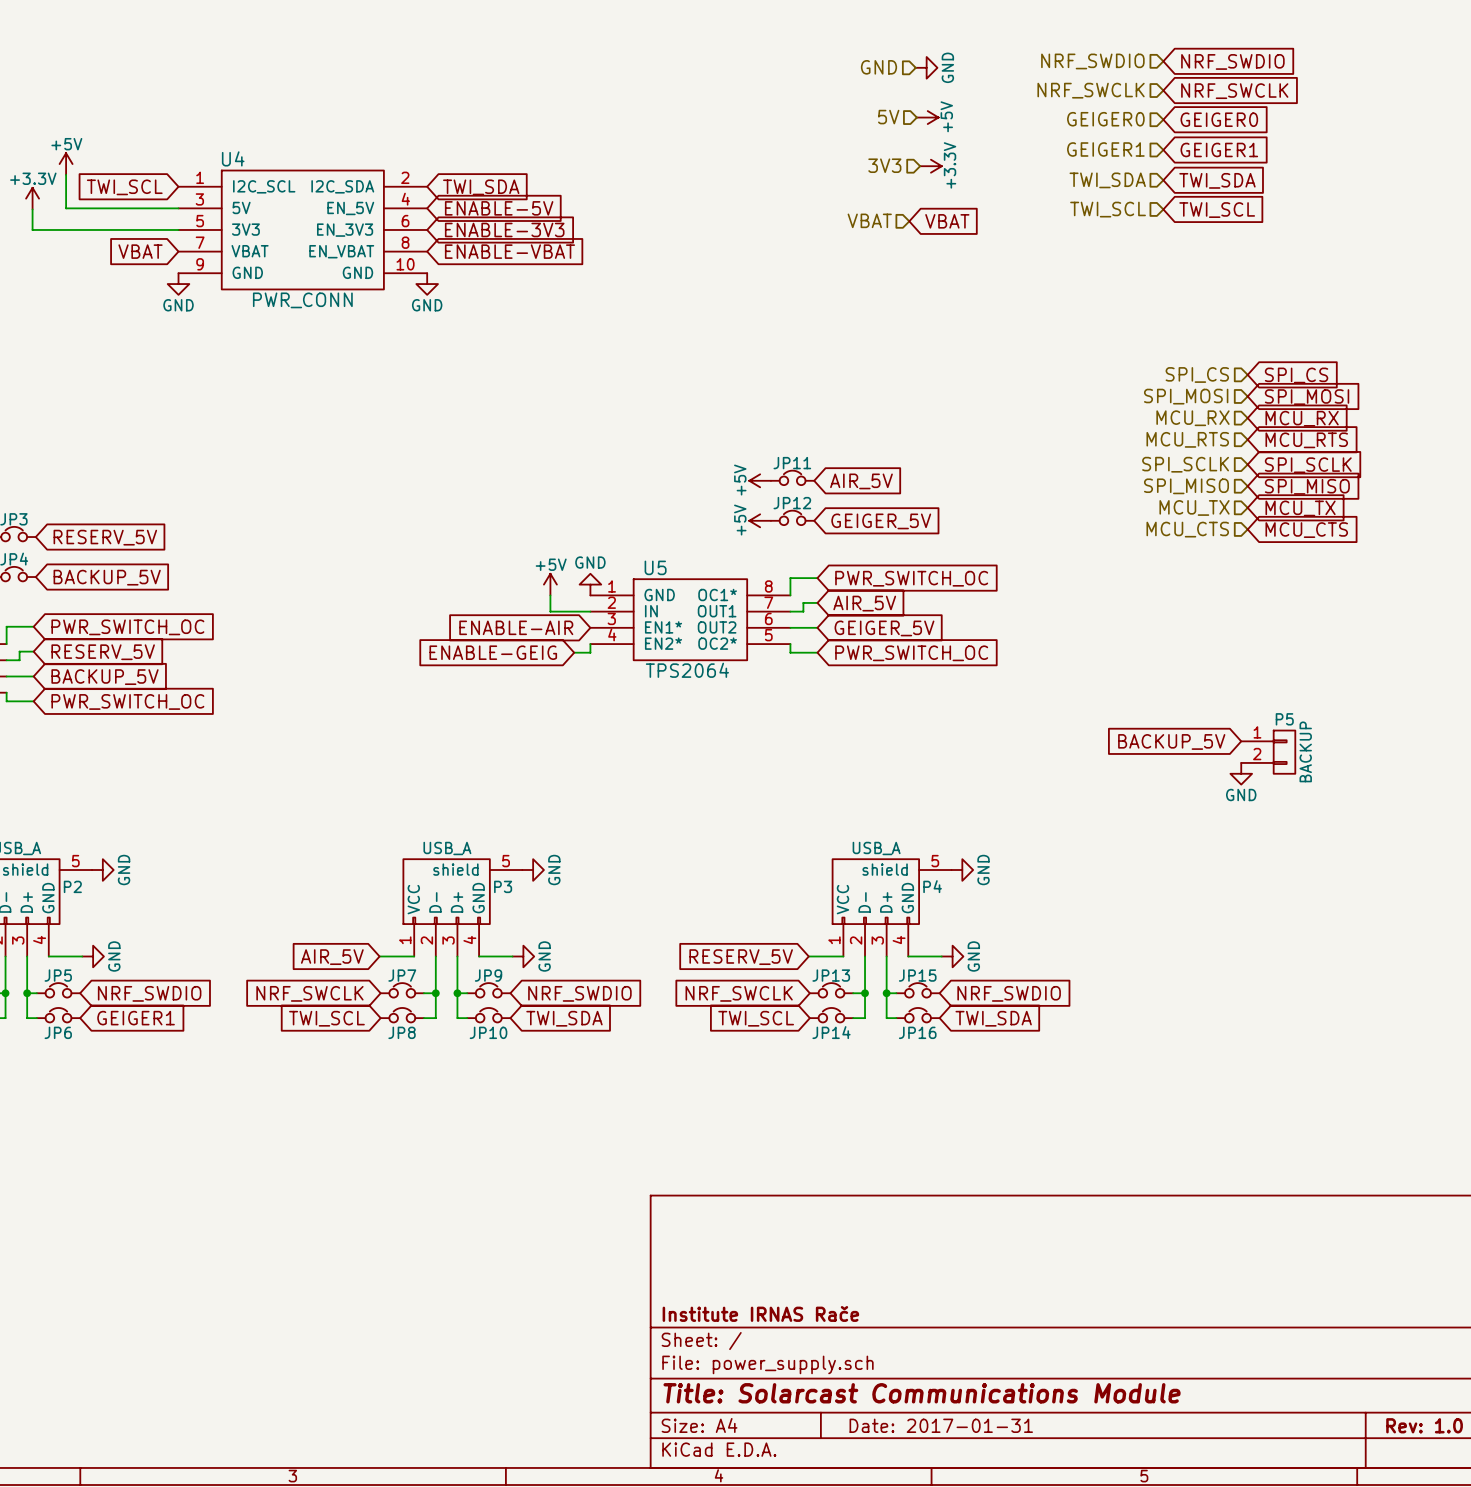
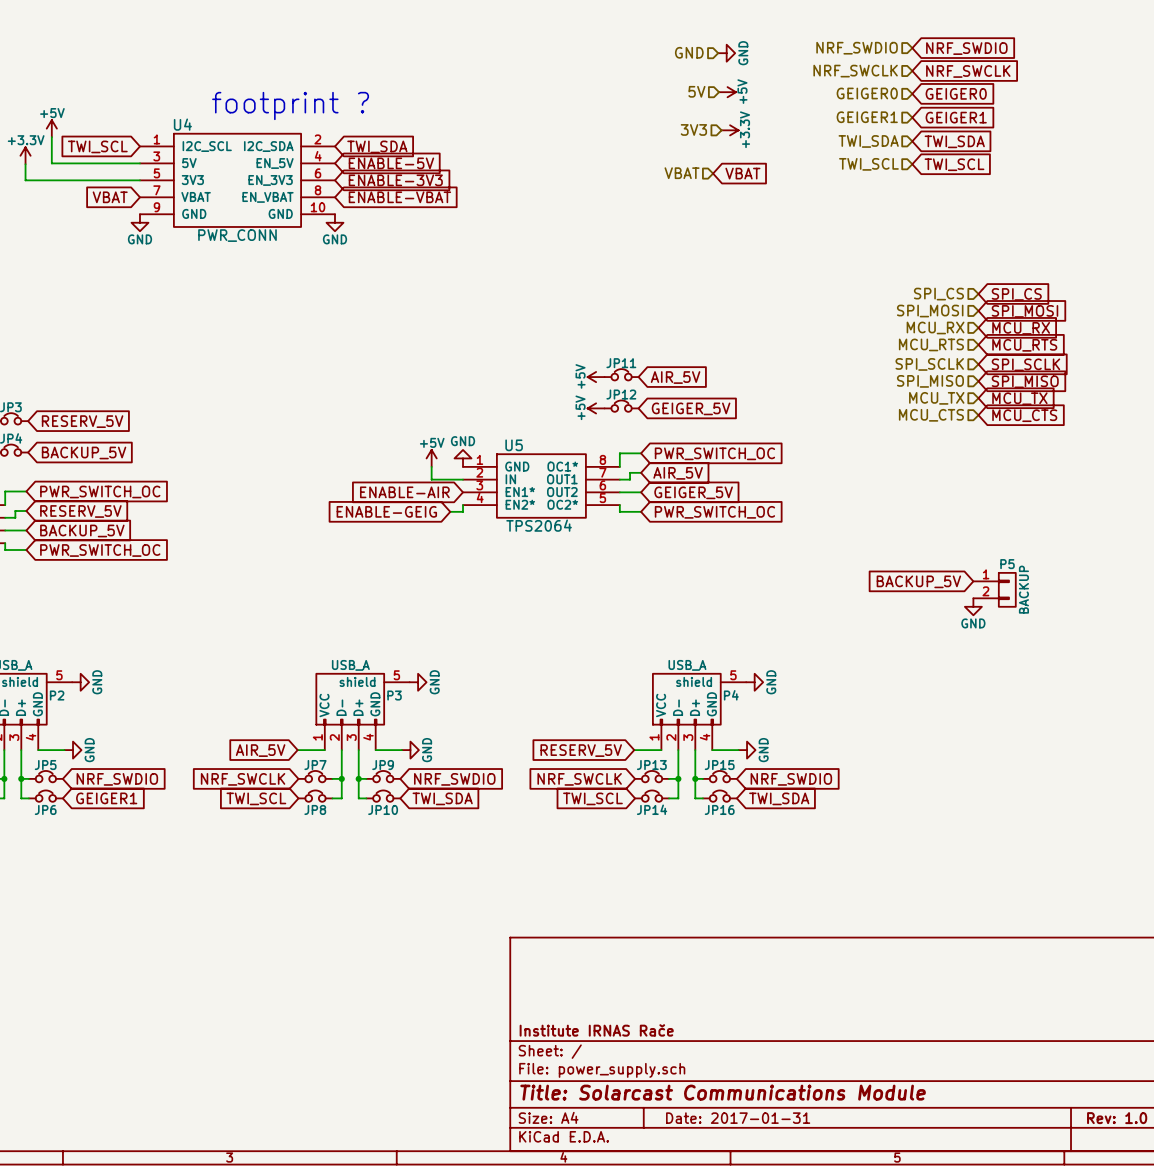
text: none -> footprint ? (290, 105)

